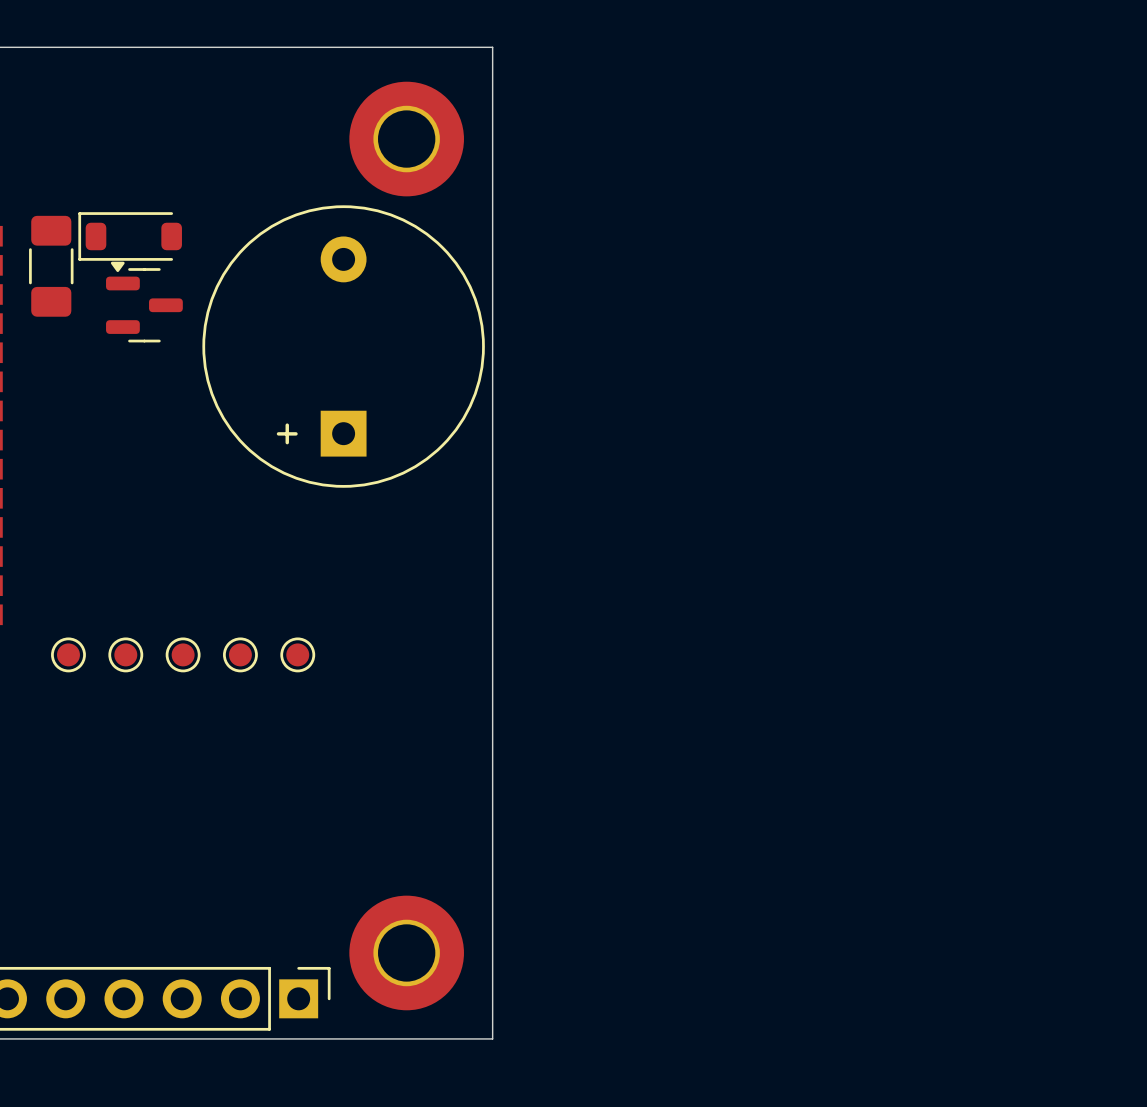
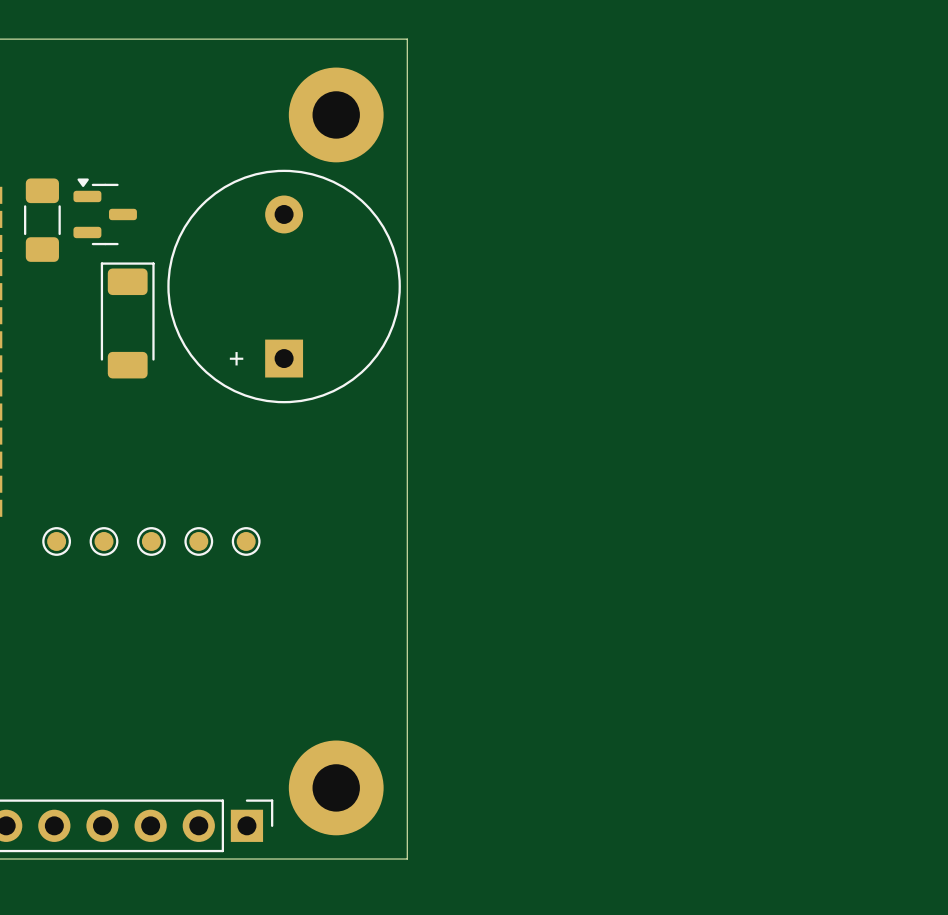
part footprint: [78, 212, 182, 261] -> [73, 178, 137, 246]
part: (144, 302) -> none
part: none -> (127, 320)

